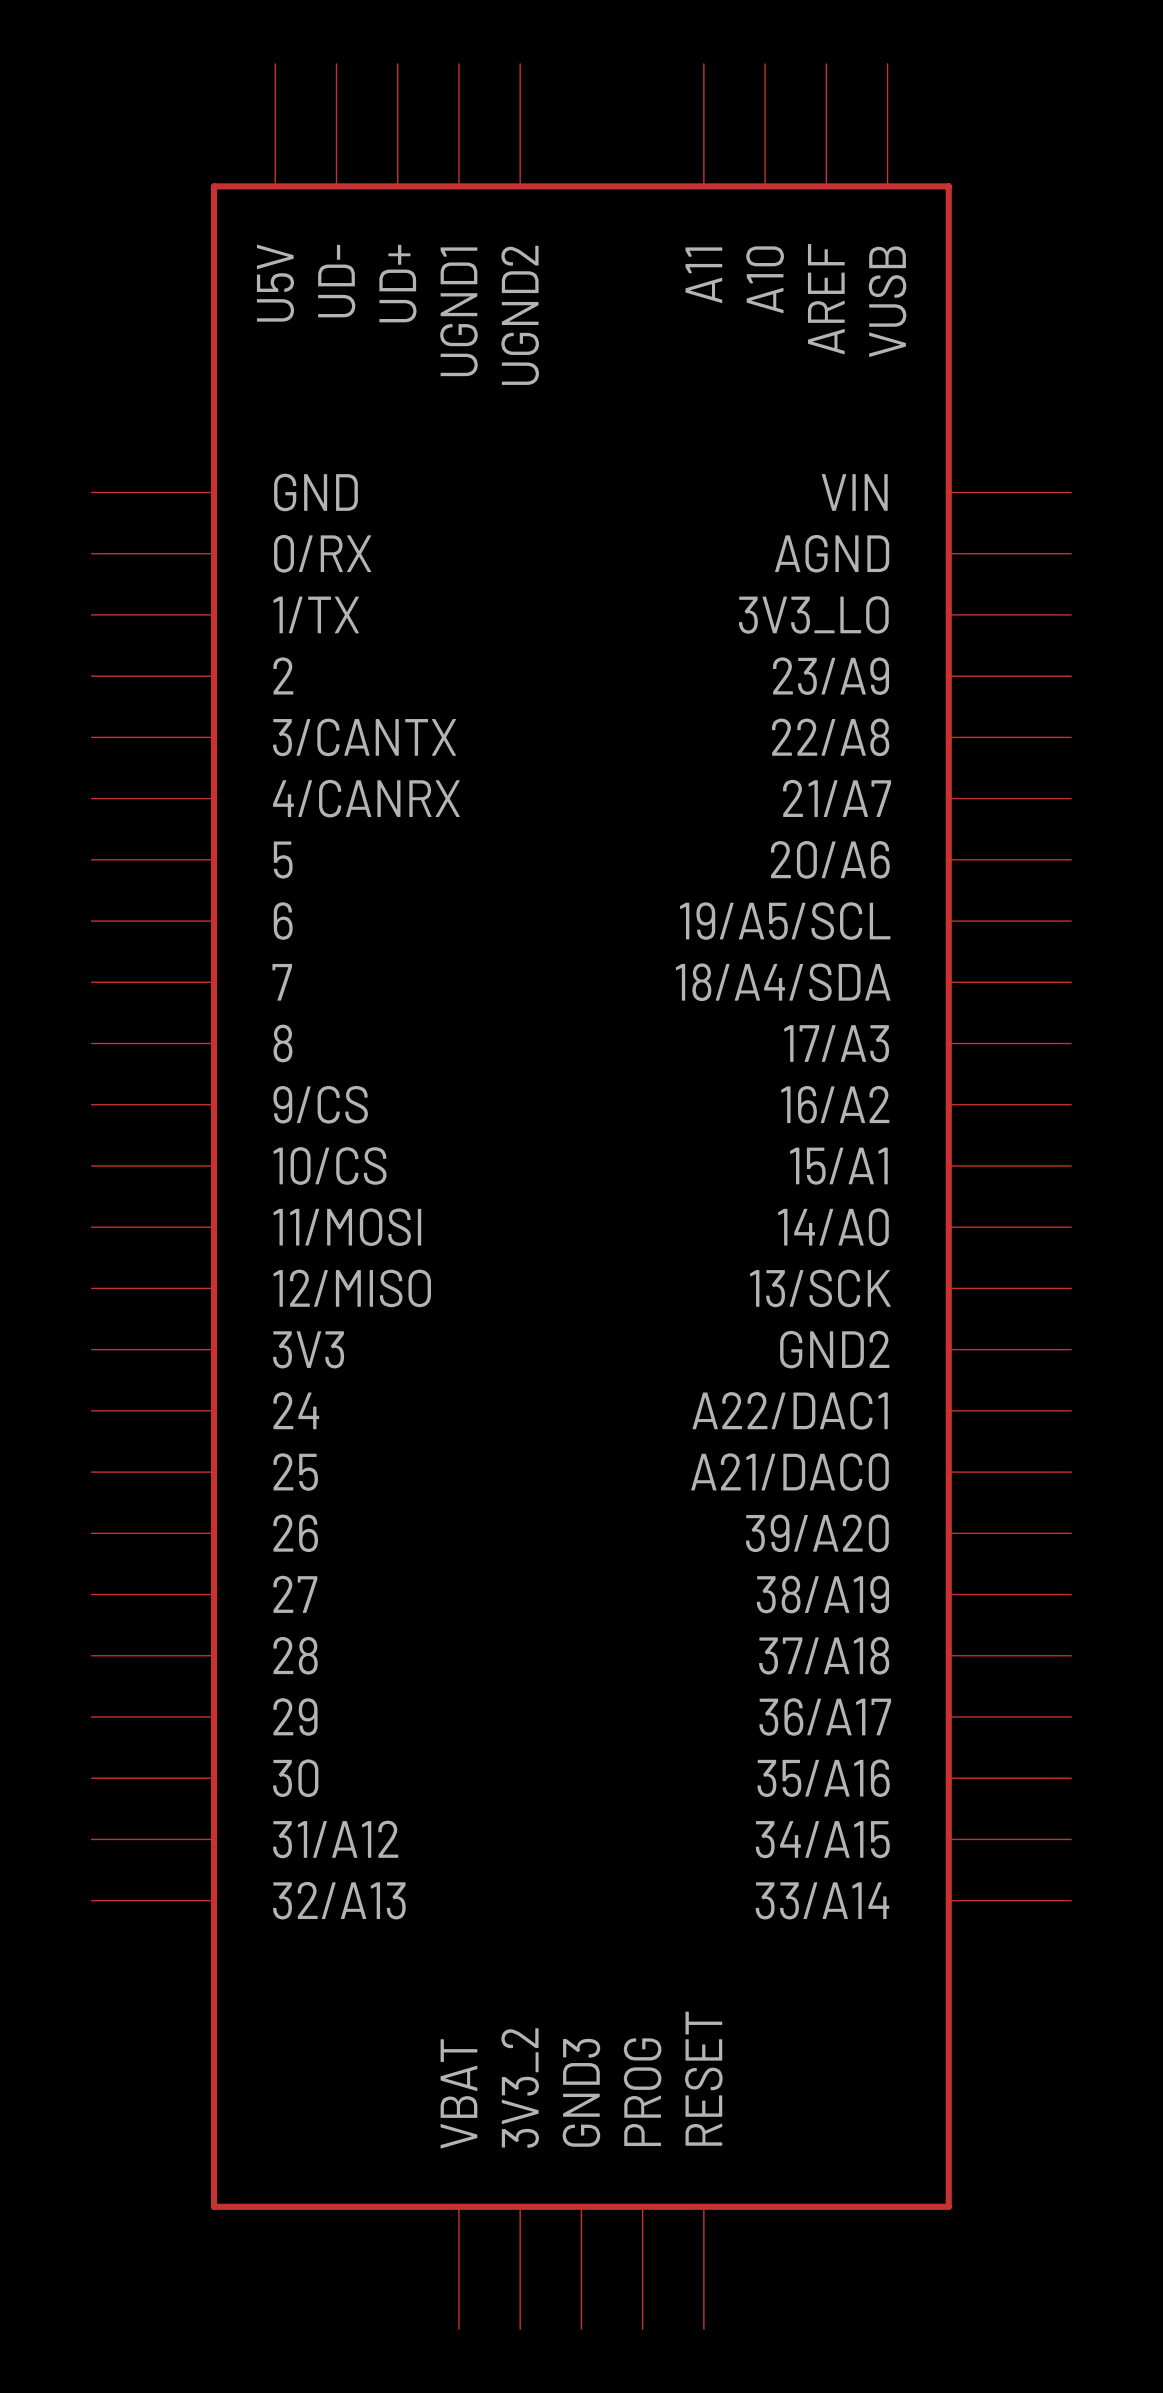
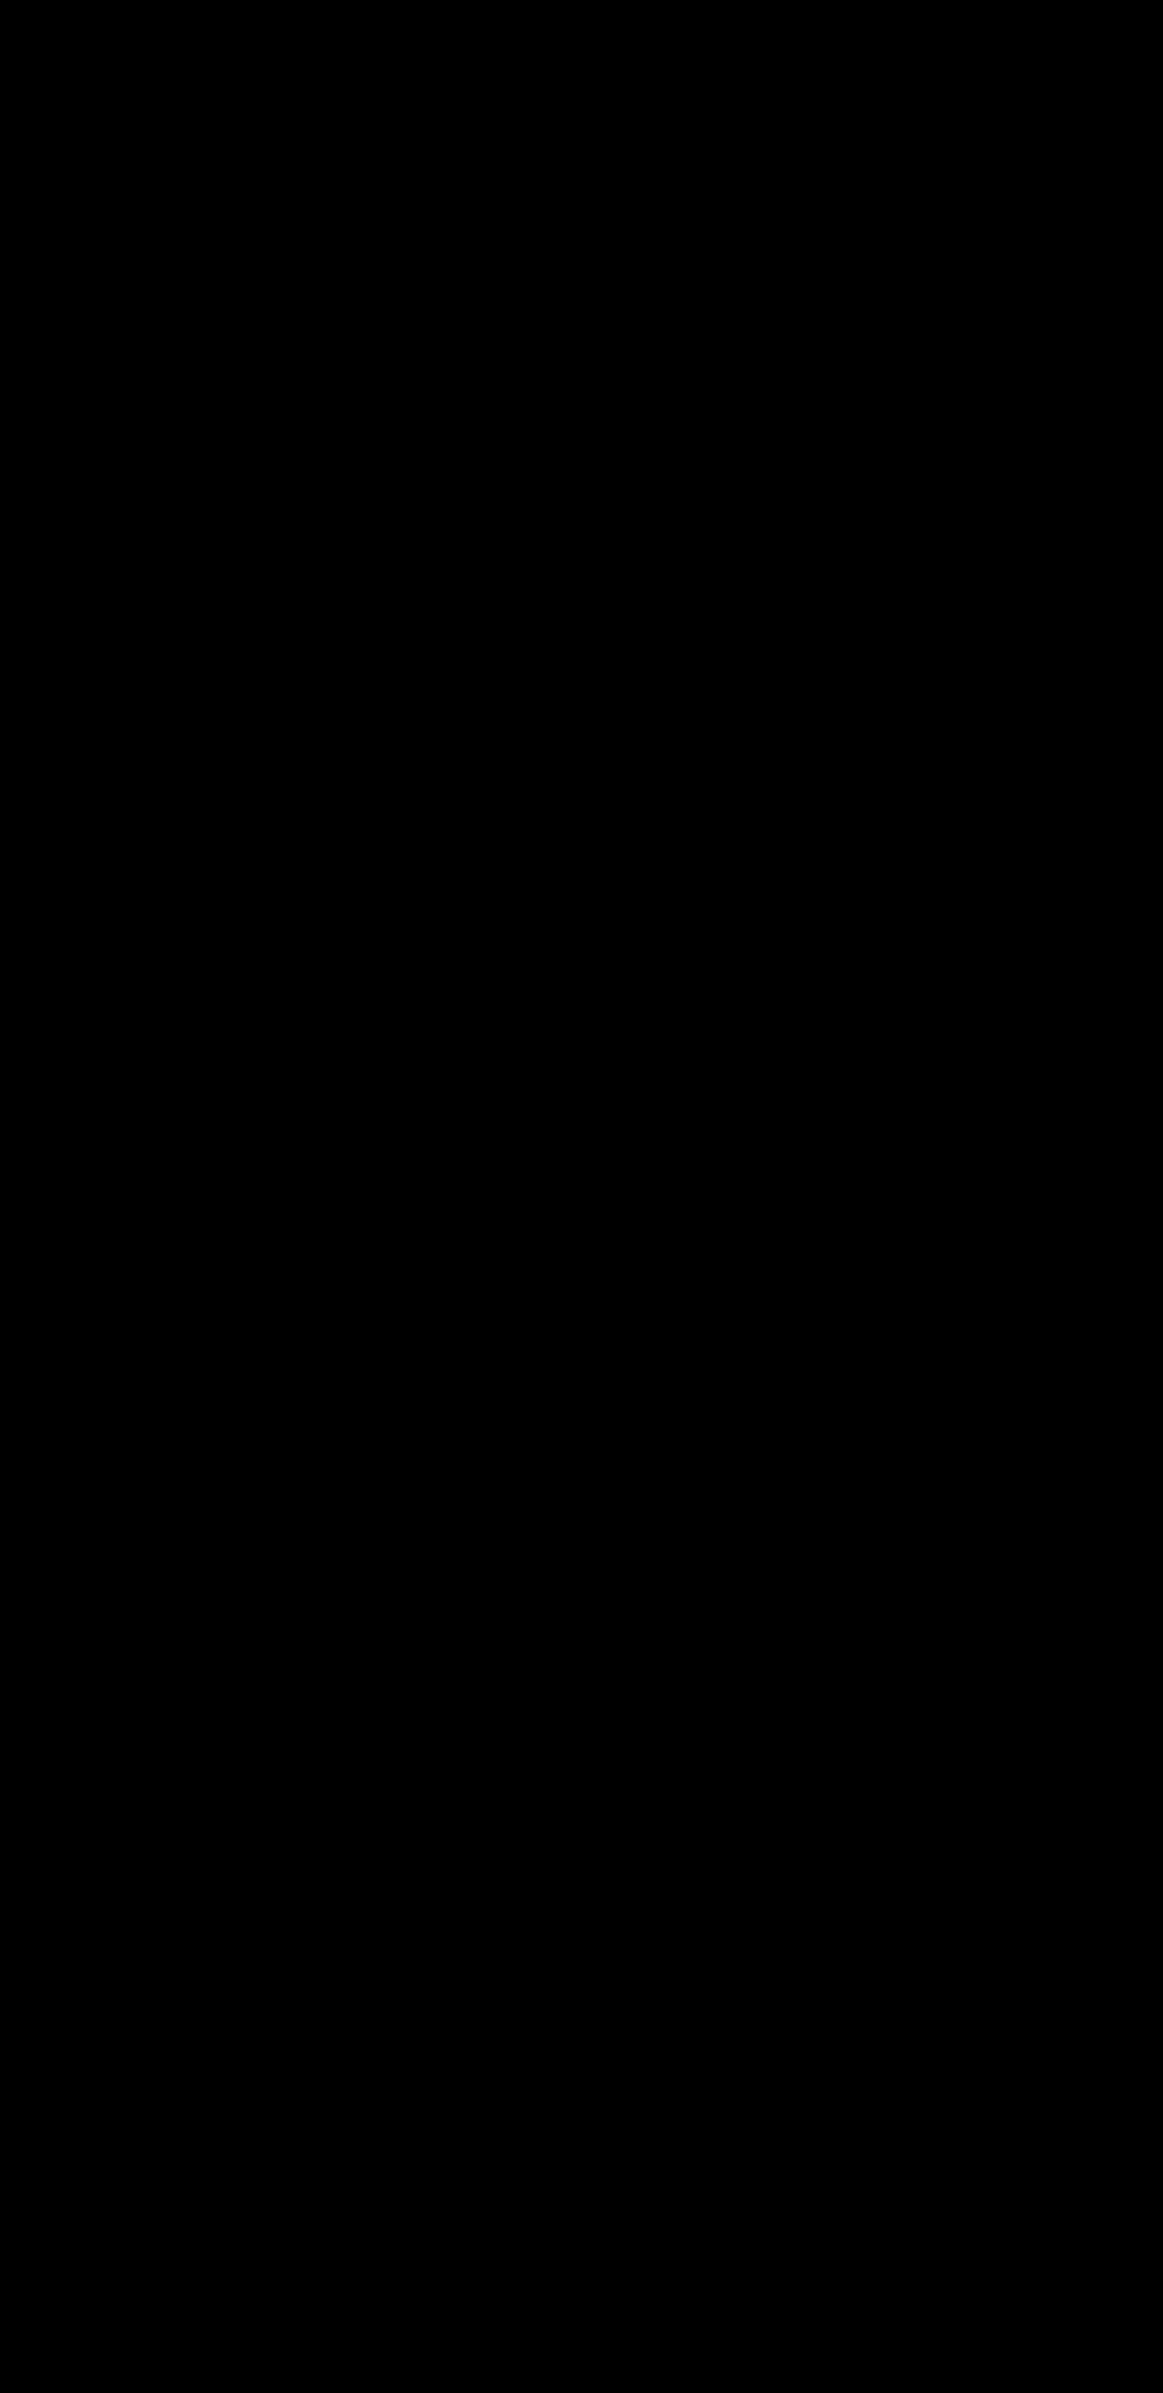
part: (581, 1196) -> none

